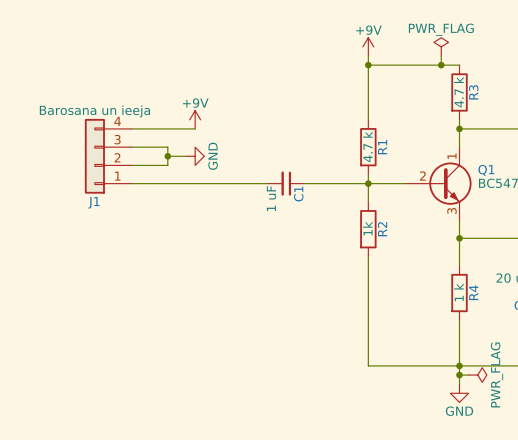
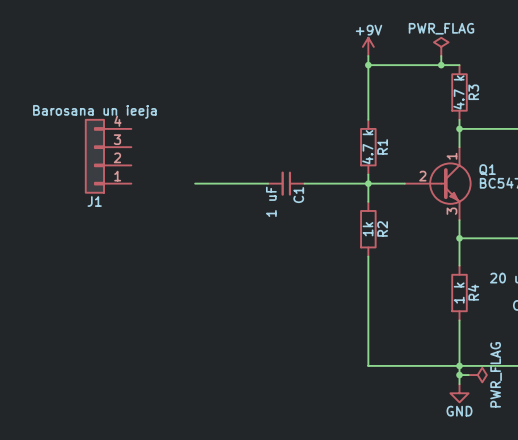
power symbol: +9V (195, 119) -> none
wire: (131, 128) (195, 128) -> none
wire: (131, 147) (167, 147) (167, 165) (131, 165) -> none
wire: (167, 156) (186, 156) -> none
junction: (167, 156) -> none
power symbol: GND (195, 156) -> none
wire: (131, 183) (195, 183) -> none

